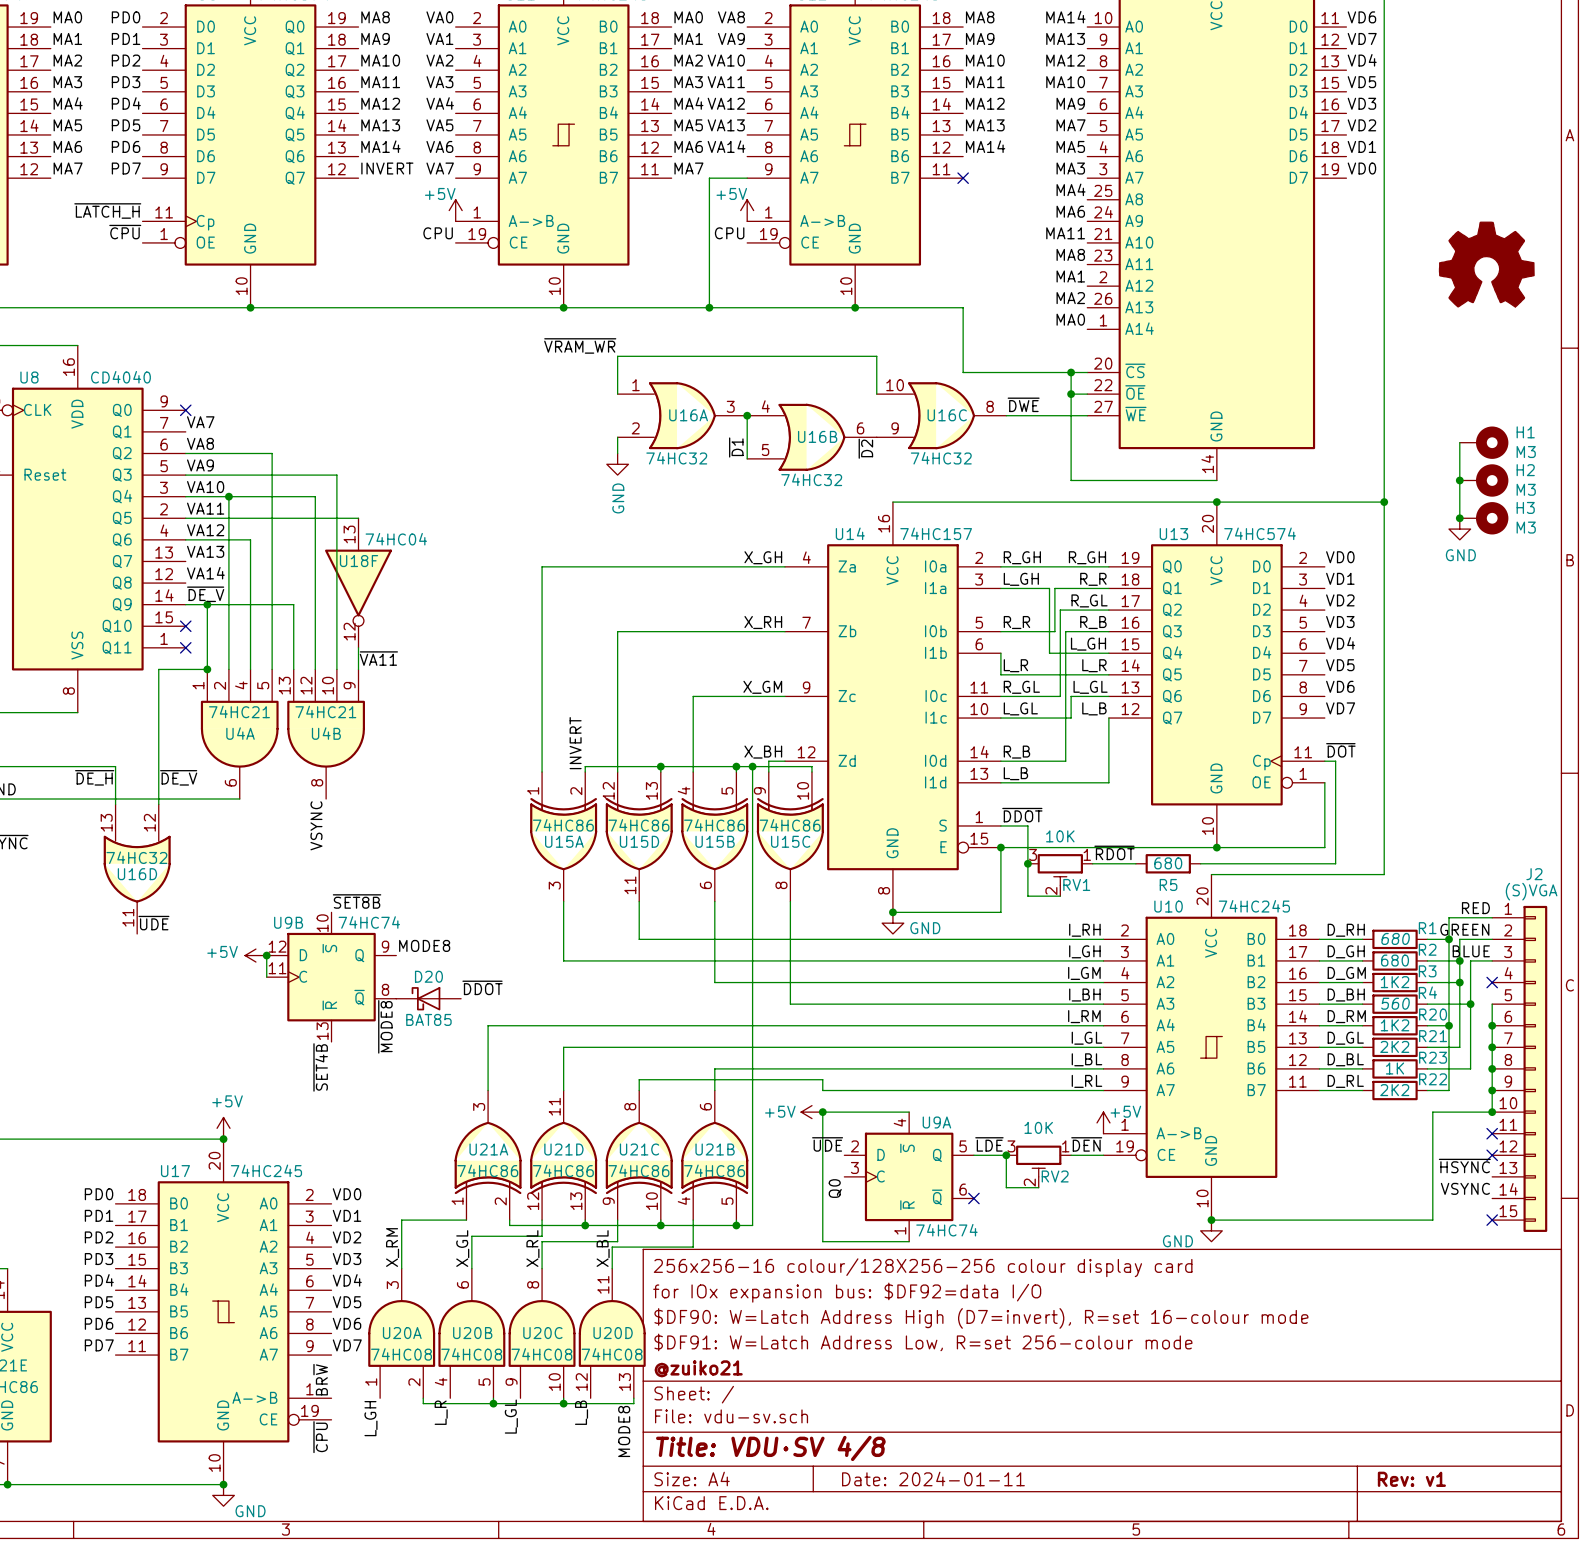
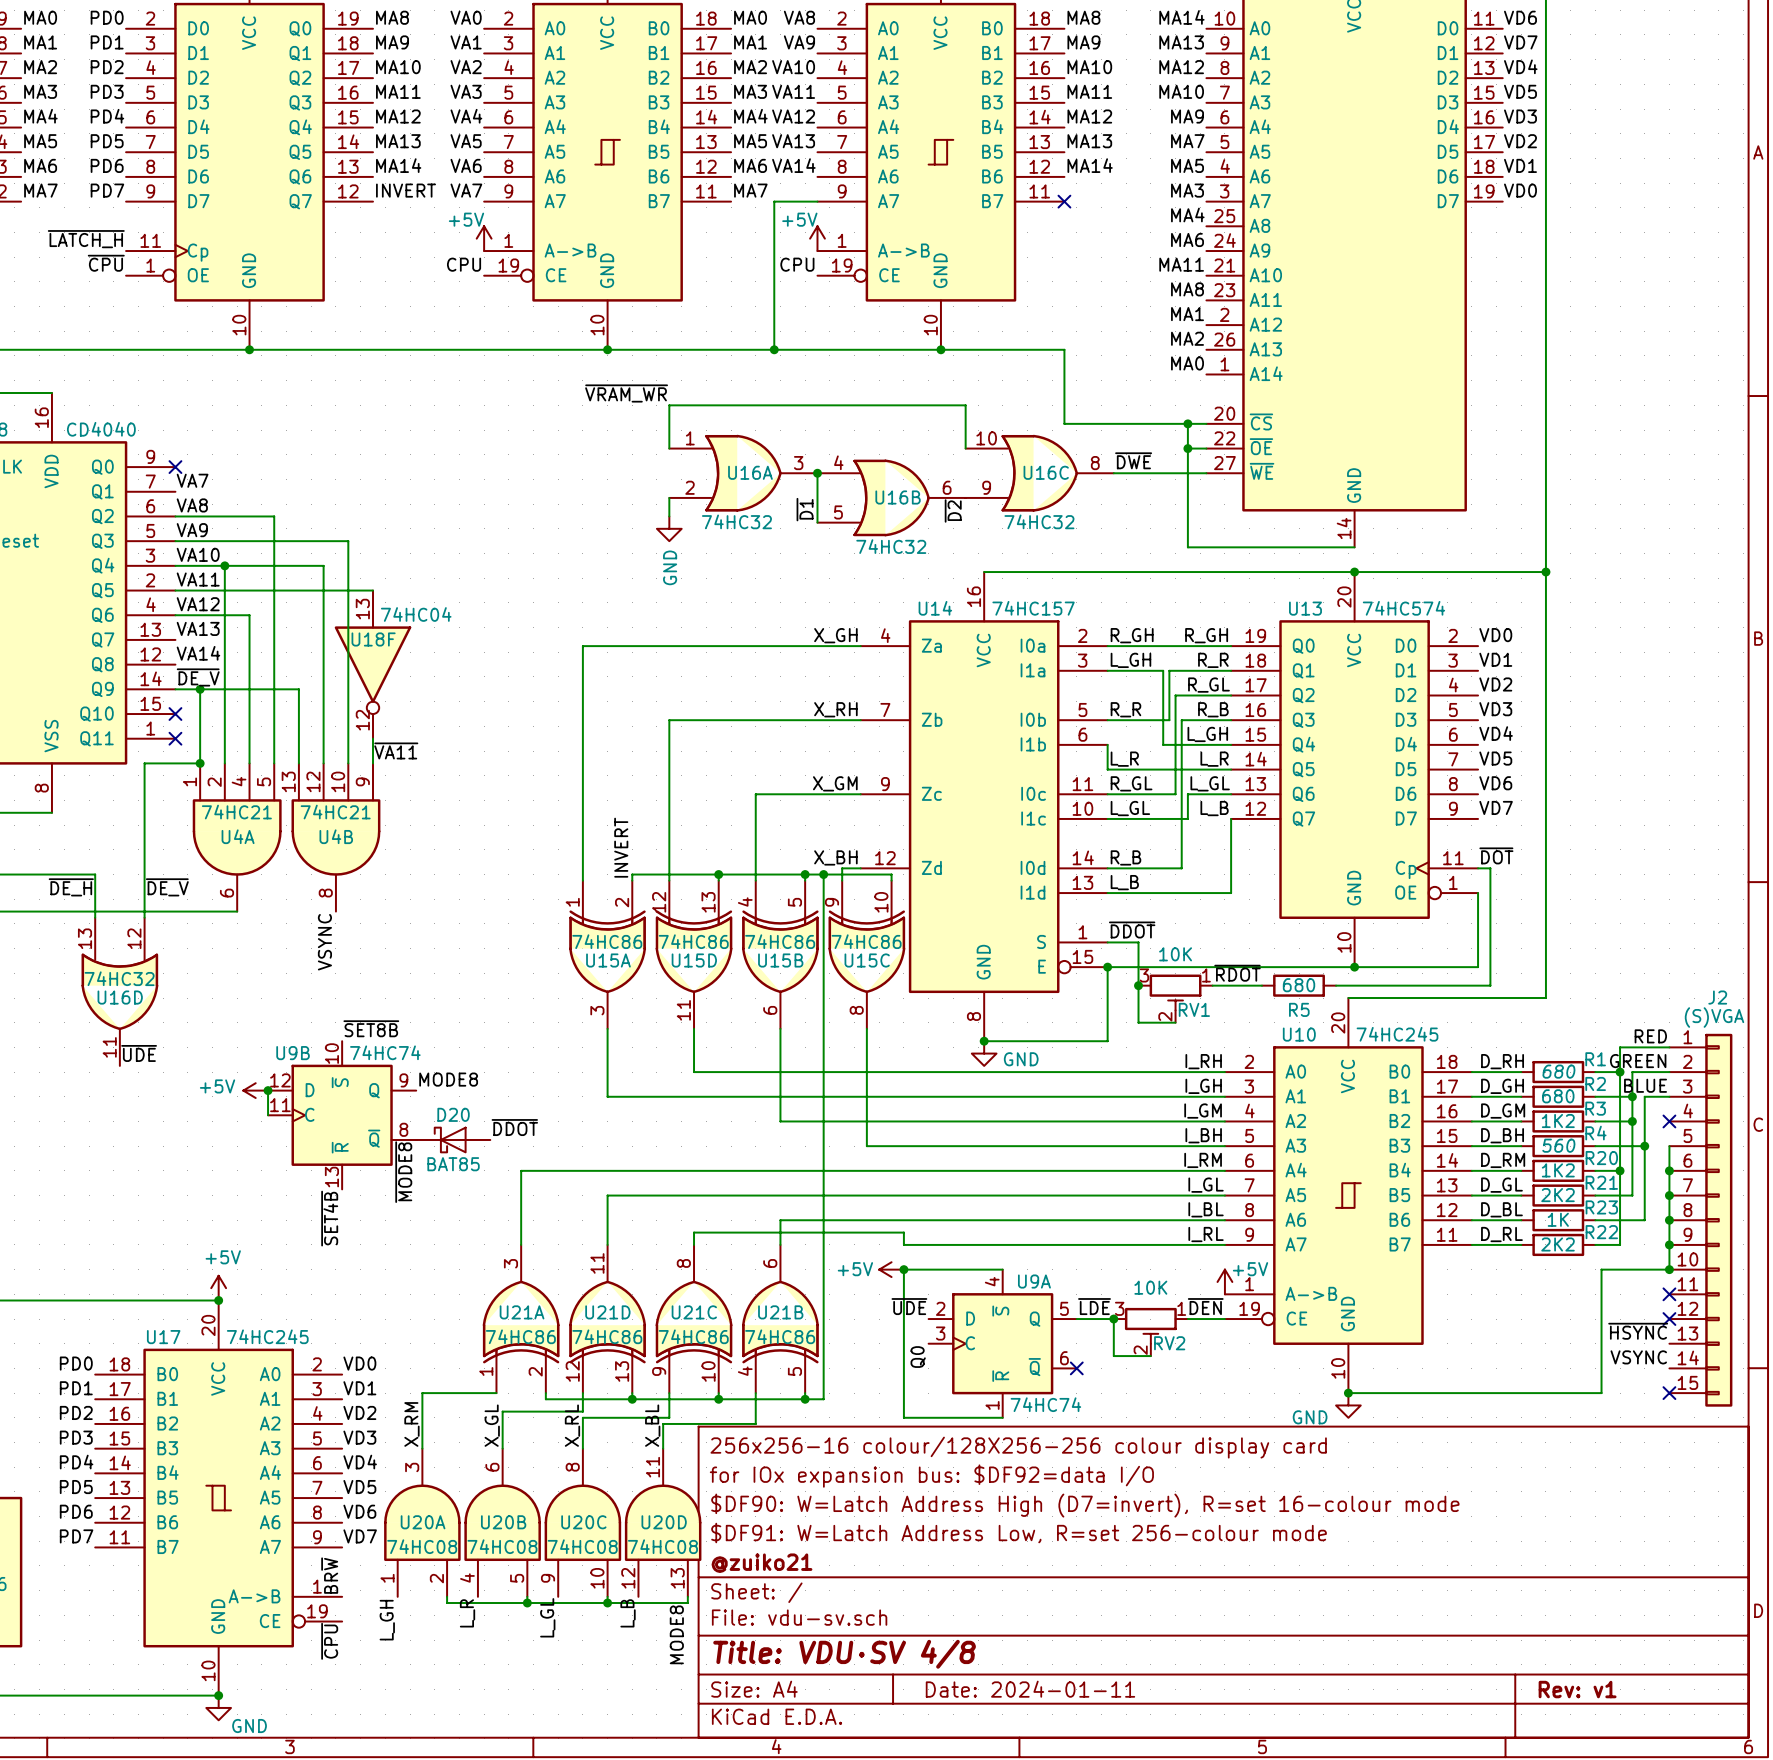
part: (1486, 264) -> none
wire: (1459, 442) (1459, 518) -> none
H1: M3 (1484, 442) -> none
junction: (1459, 480) -> none
H2: M3 (1484, 480) -> none
junction: (1459, 518) -> none
H3: M3 (1484, 518) -> none
power symbol: GND (1459, 529) -> none

